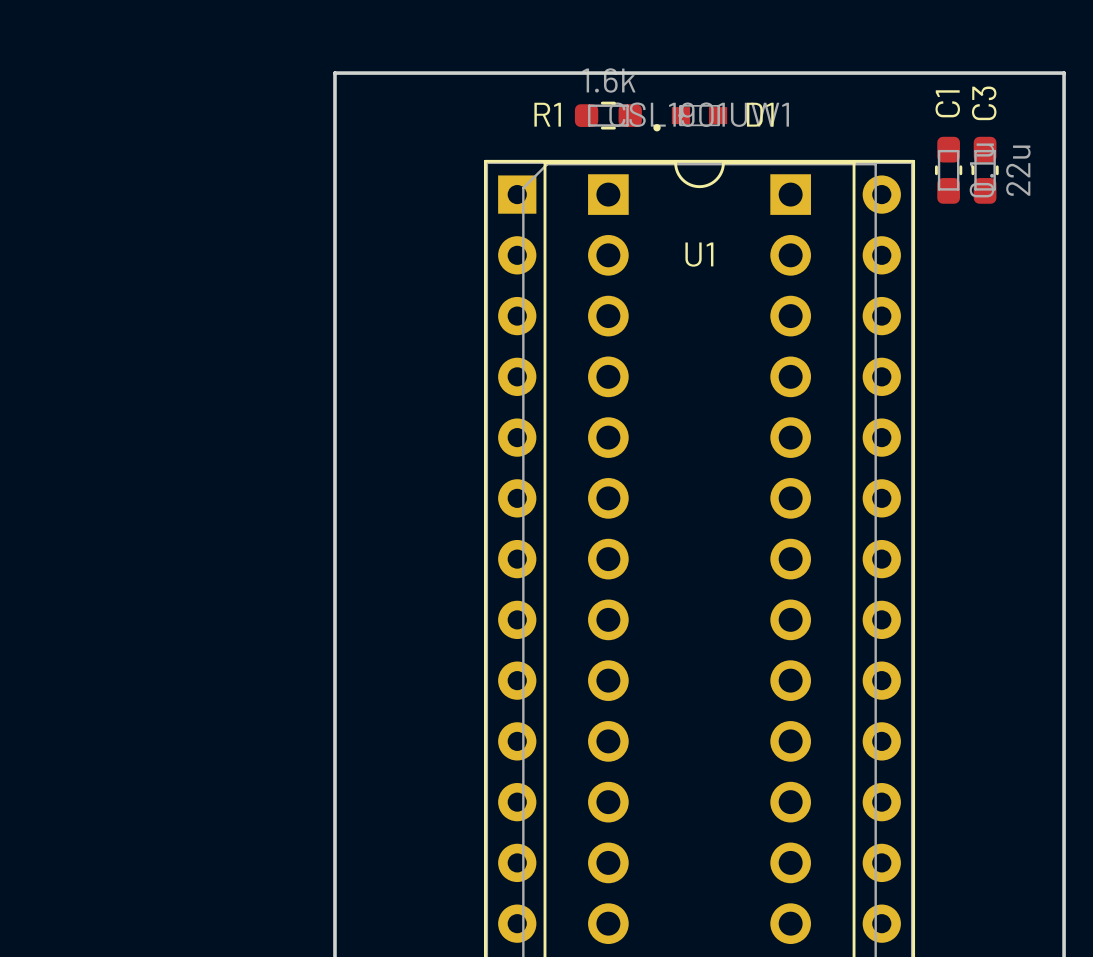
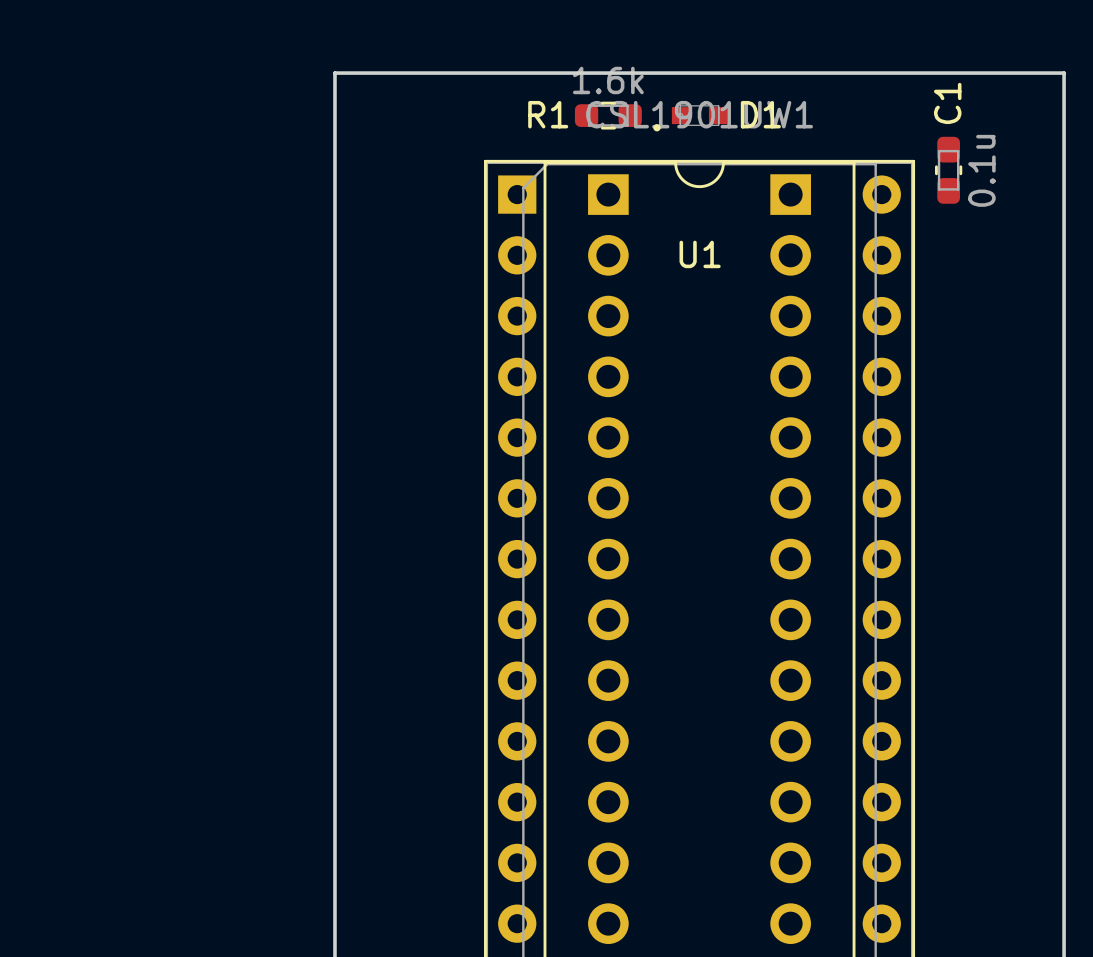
C3: 22u (985, 170) -> none

